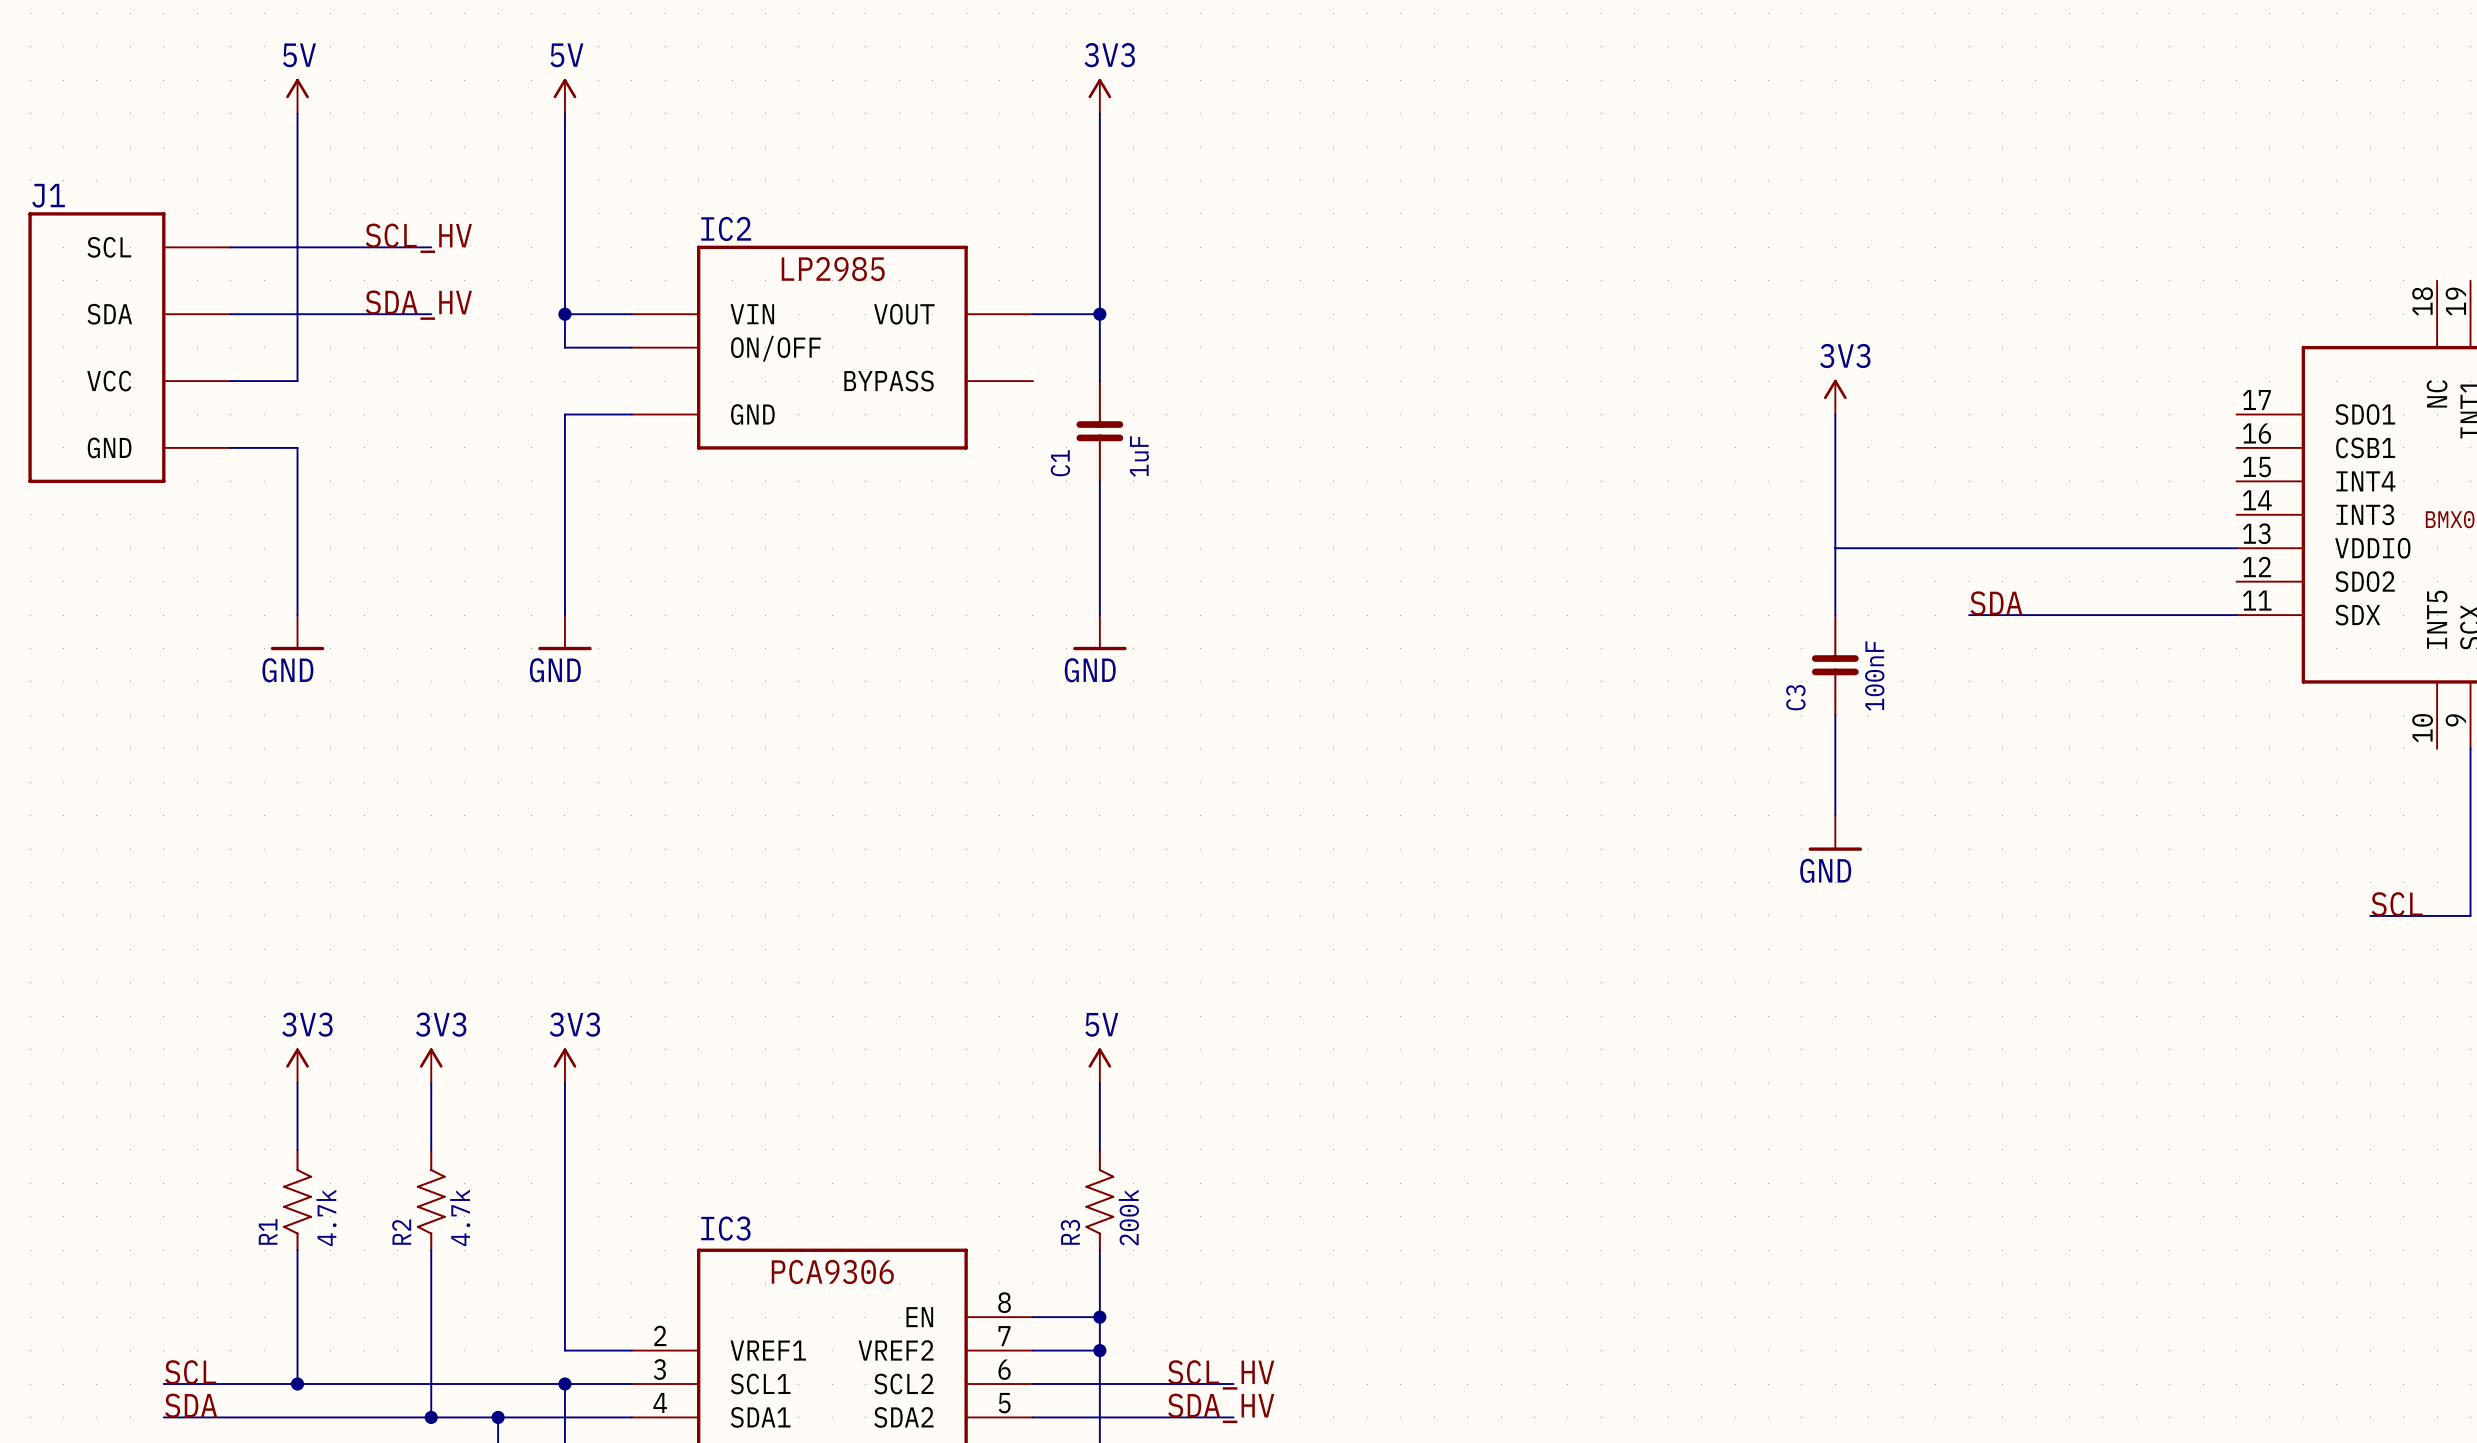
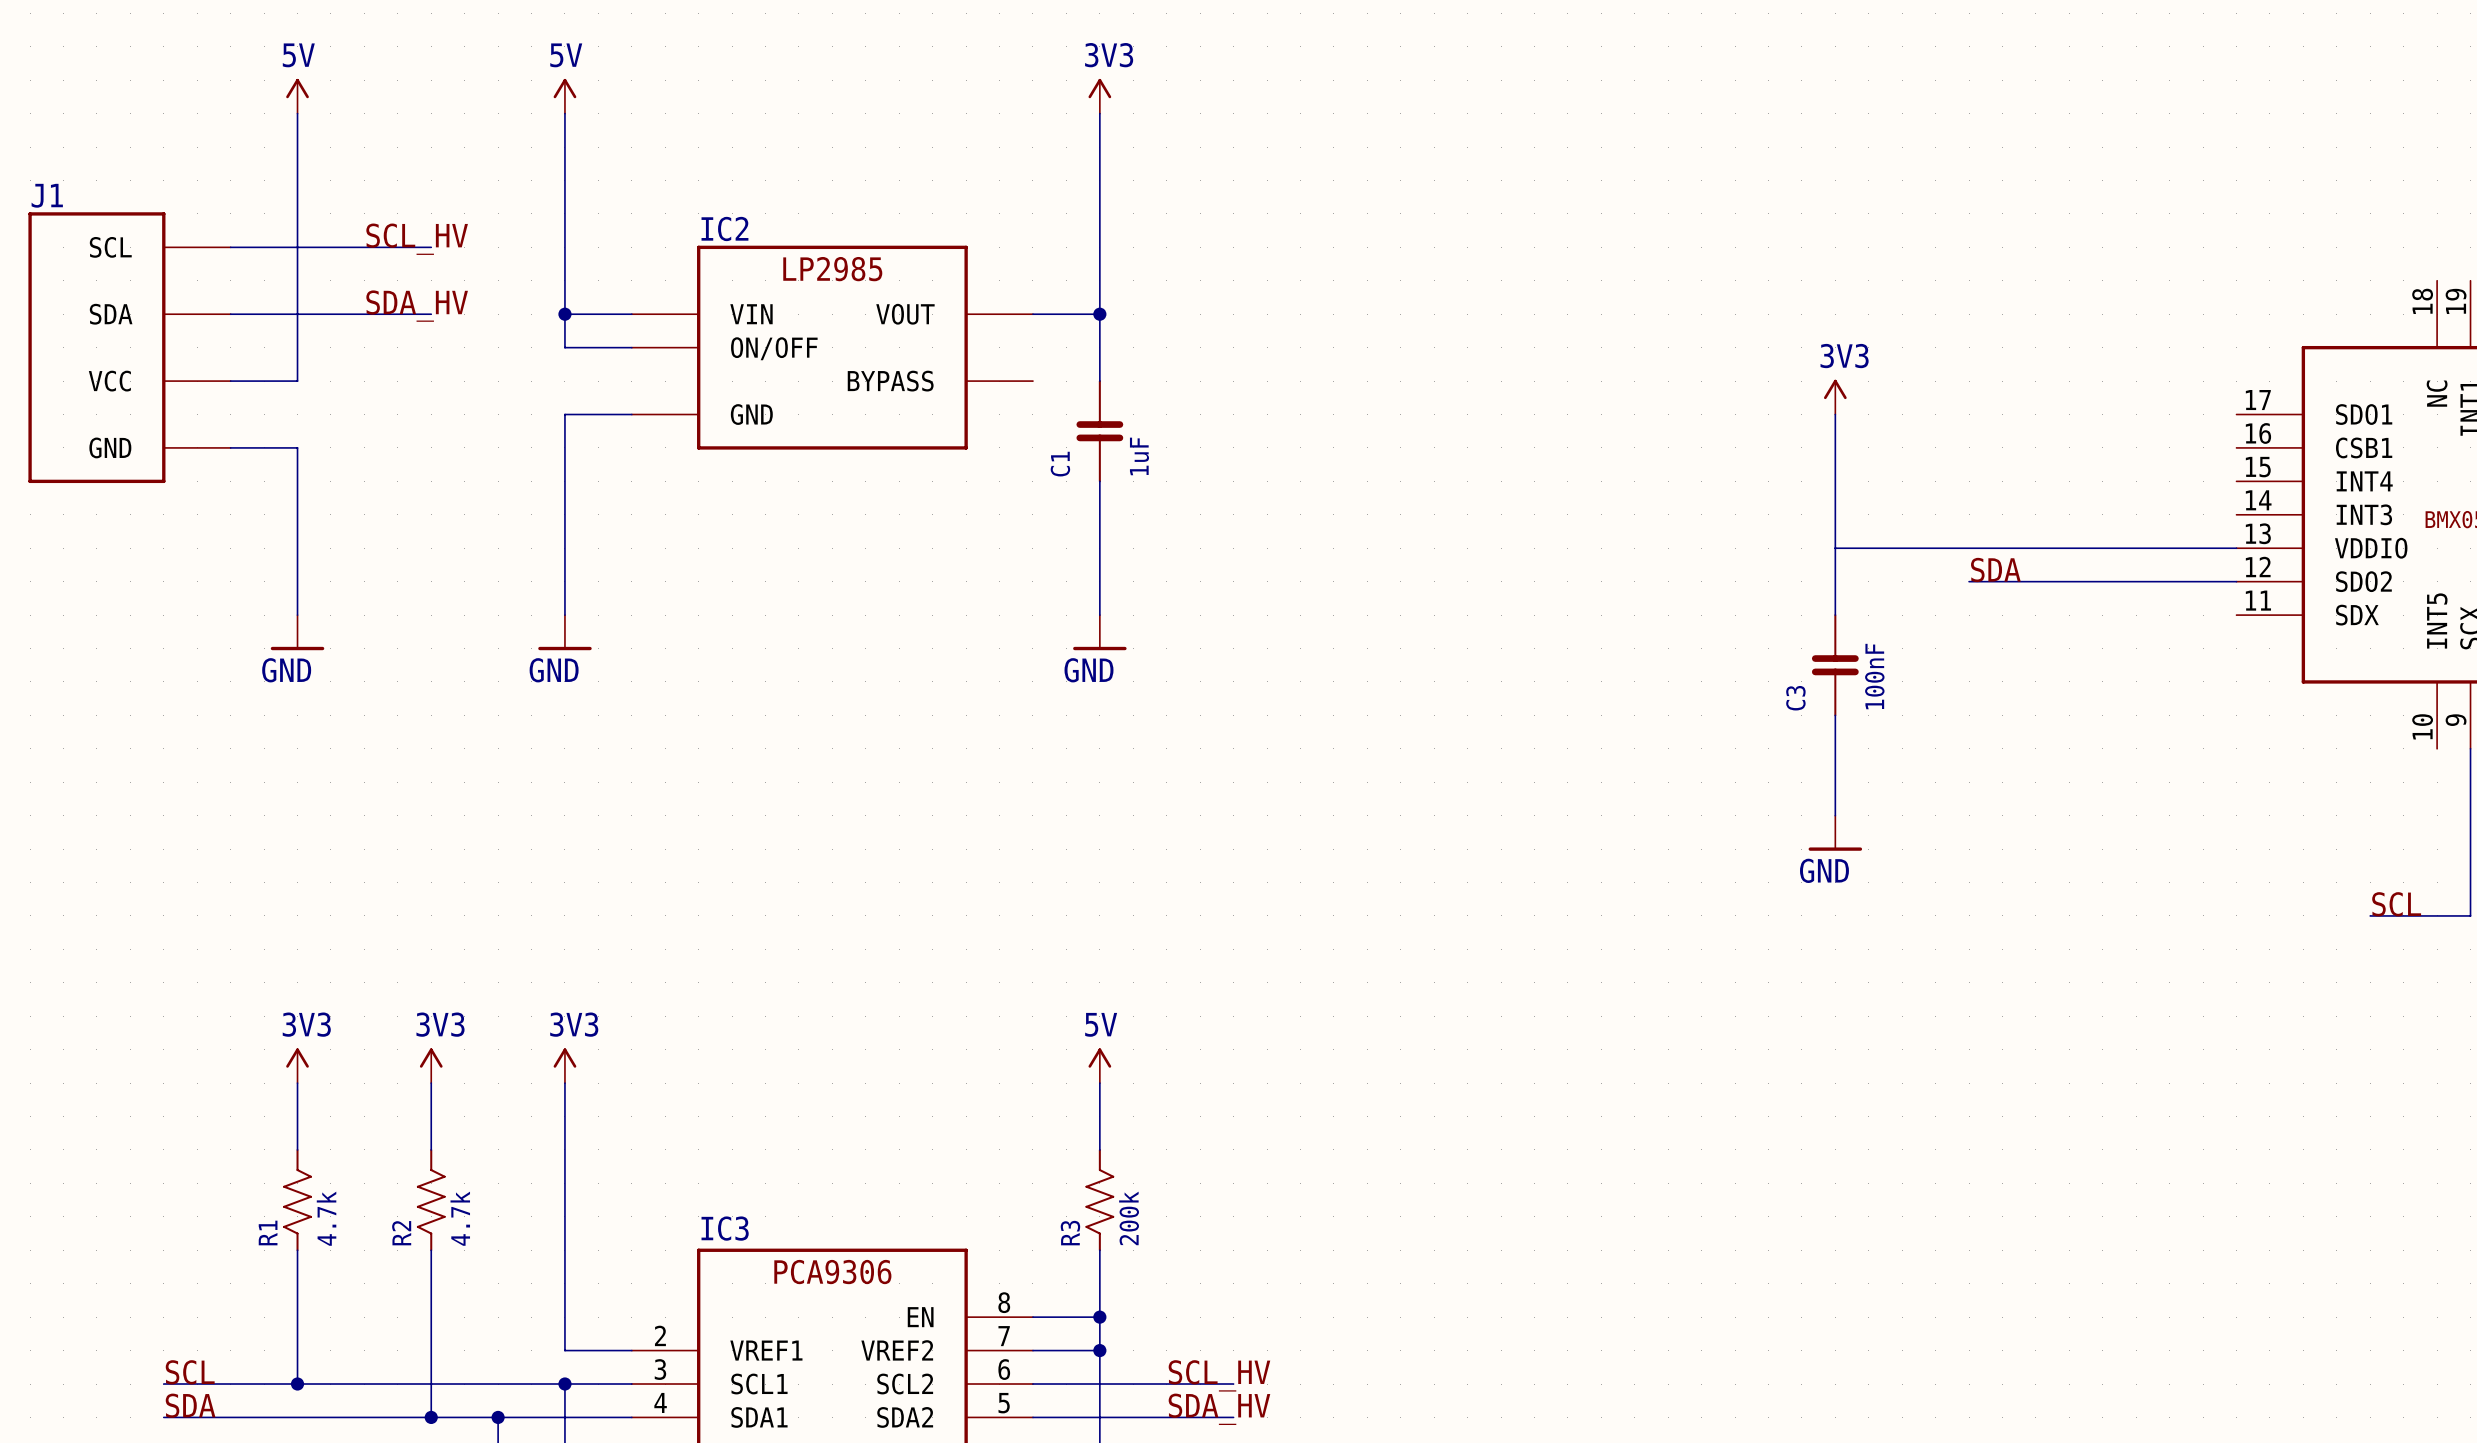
label position: SDA (1996, 603) -> SDA (1995, 569)
wire: (1969, 615) (2236, 615) -> (1969, 581) (2236, 581)

